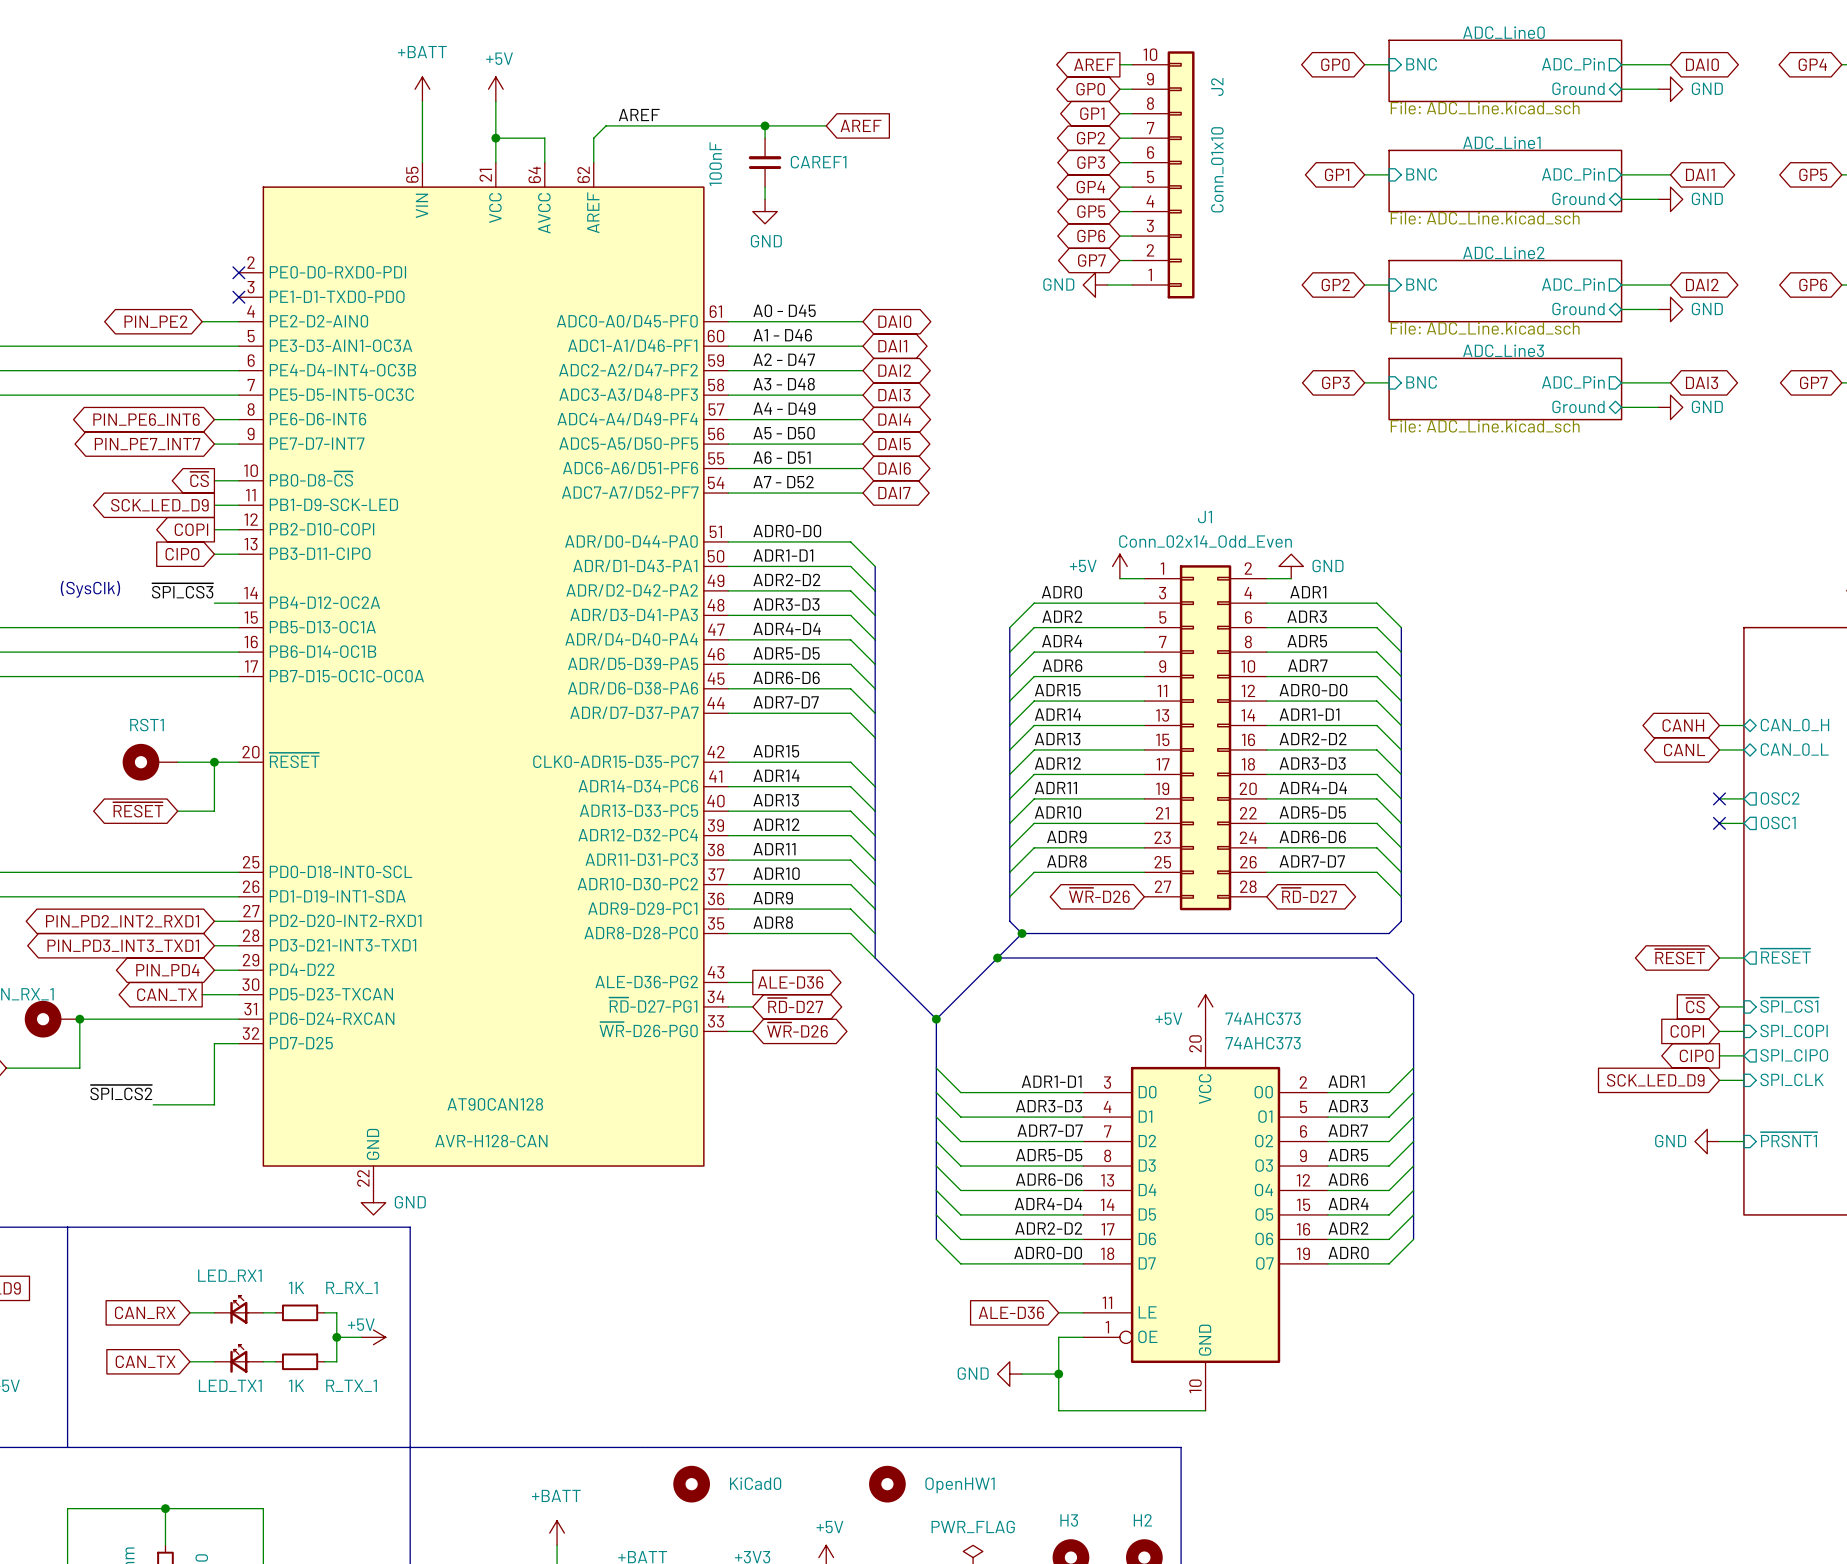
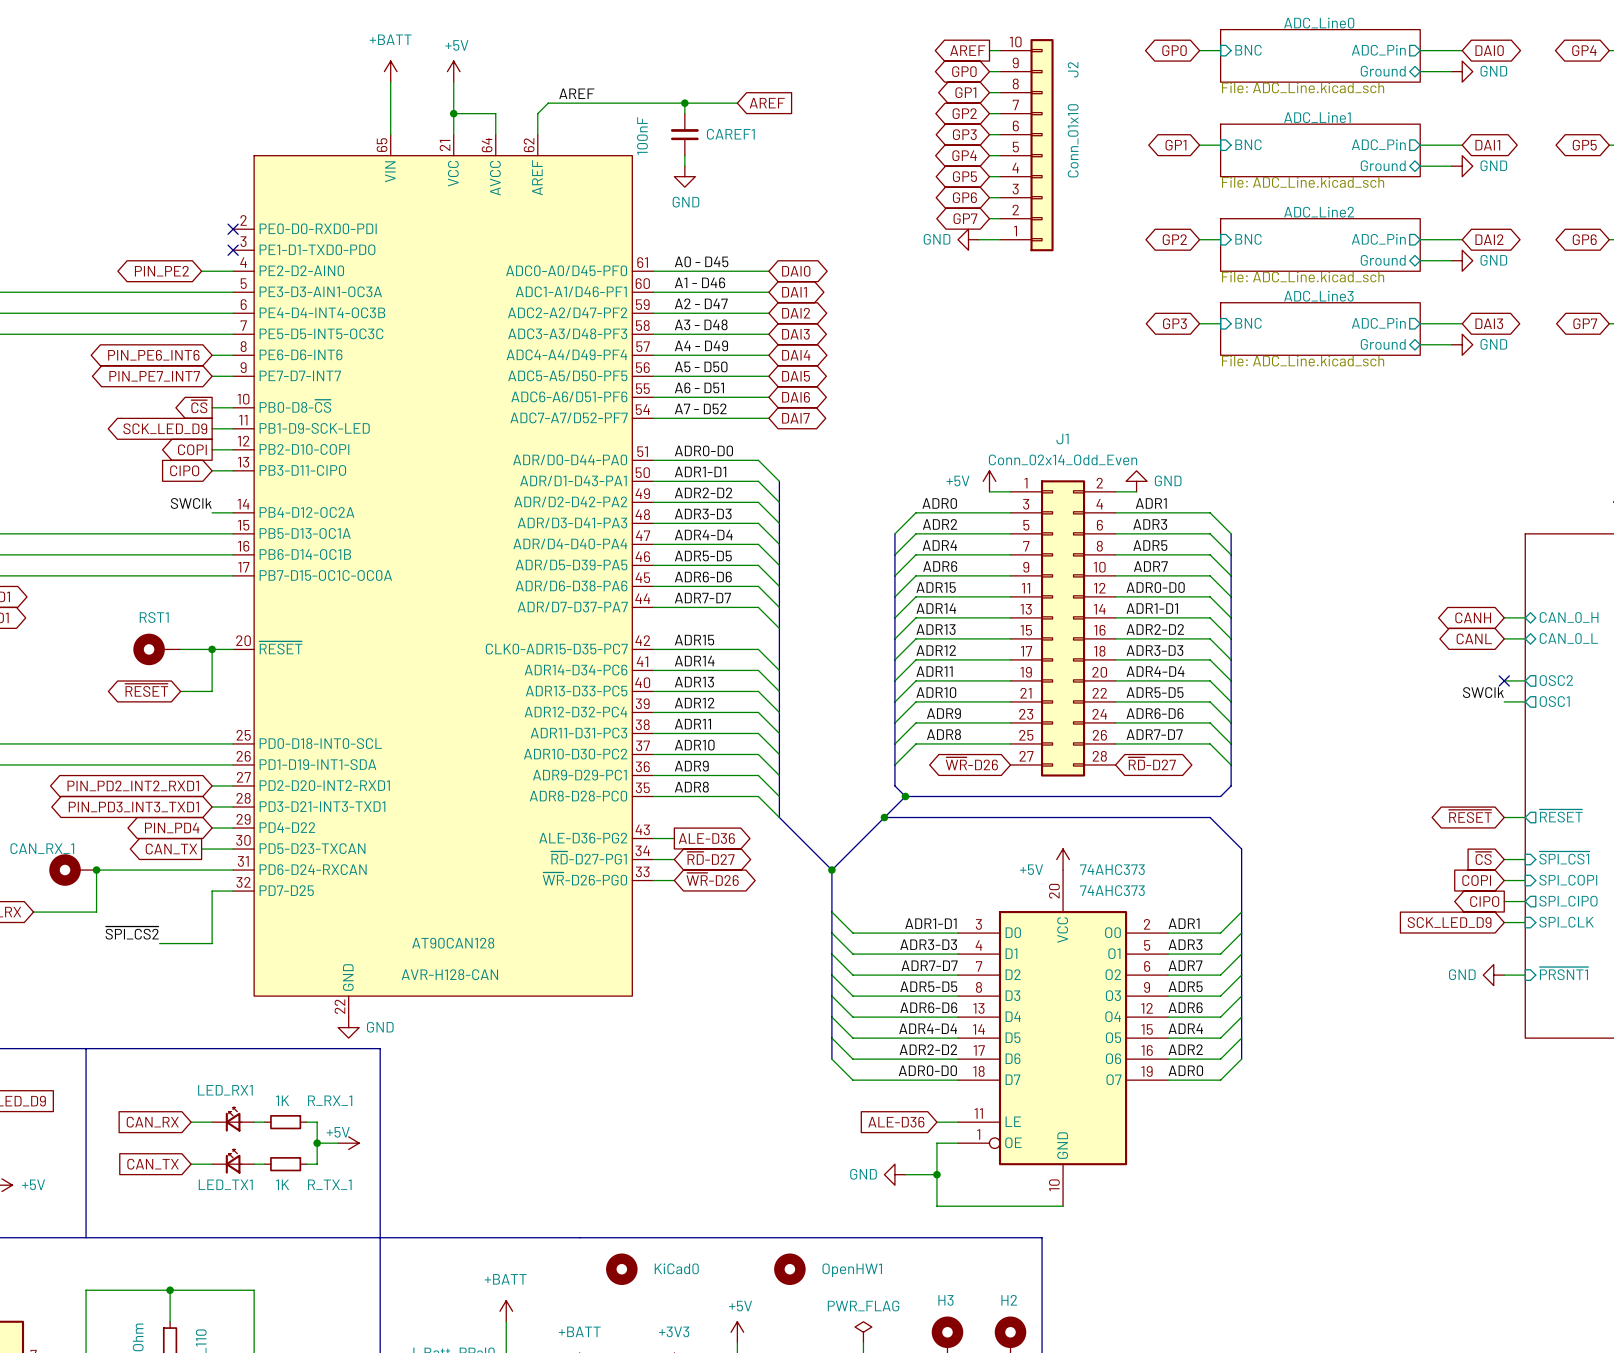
text: (SysClk) (90, 589) -> none
label: ~{SPI_CS3} (182, 590) -> SWClk (191, 503)
label: none -> SWClk (1483, 692)
no-connect mark: (1719, 823) -> none

